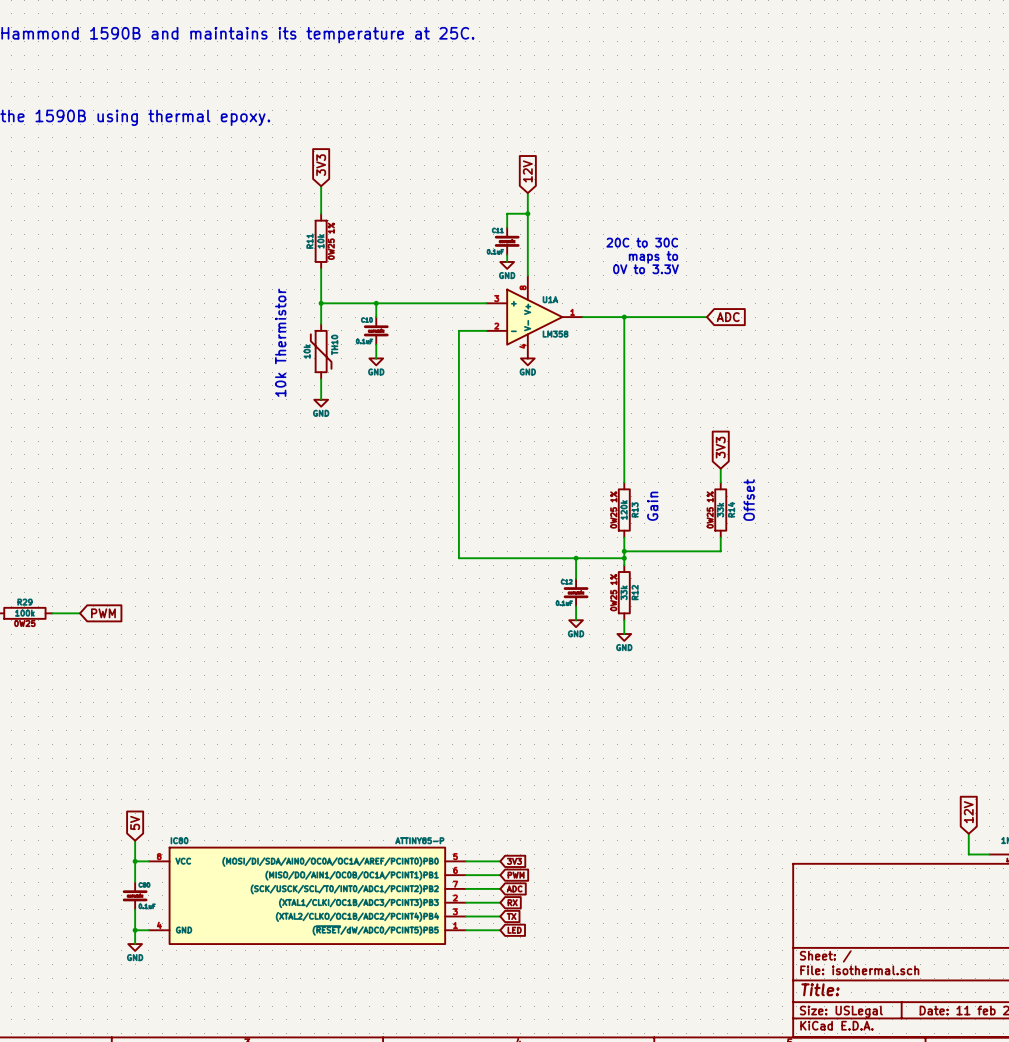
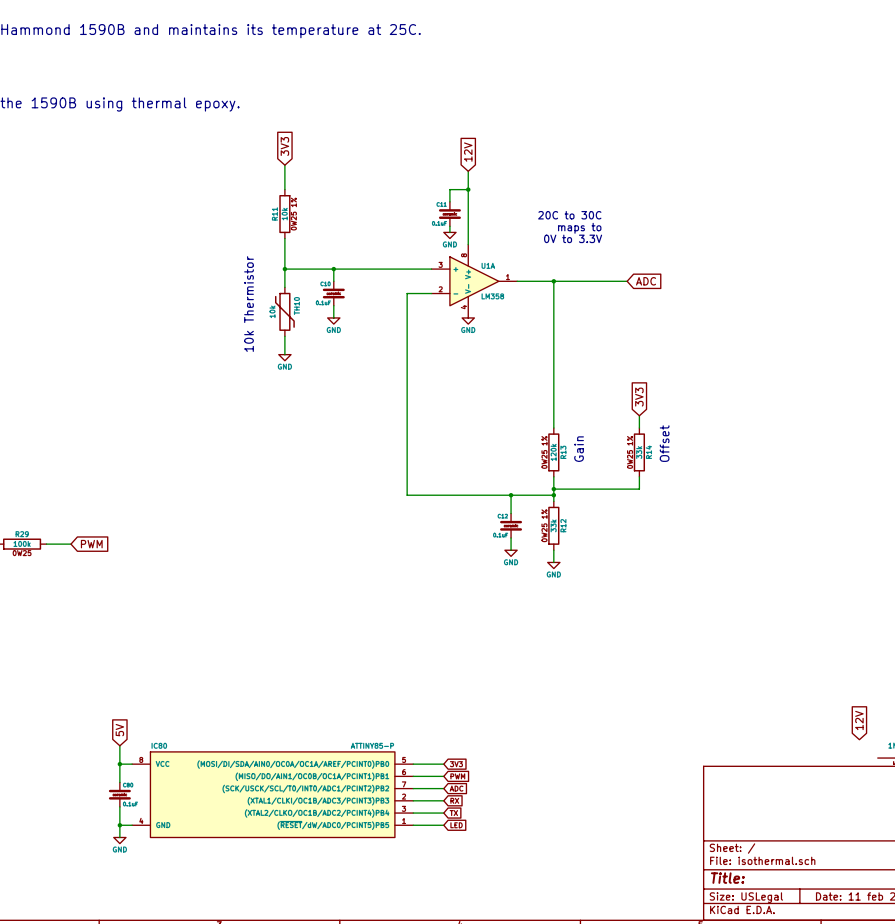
wire: (968, 833) (968, 854) (989, 854) -> none

